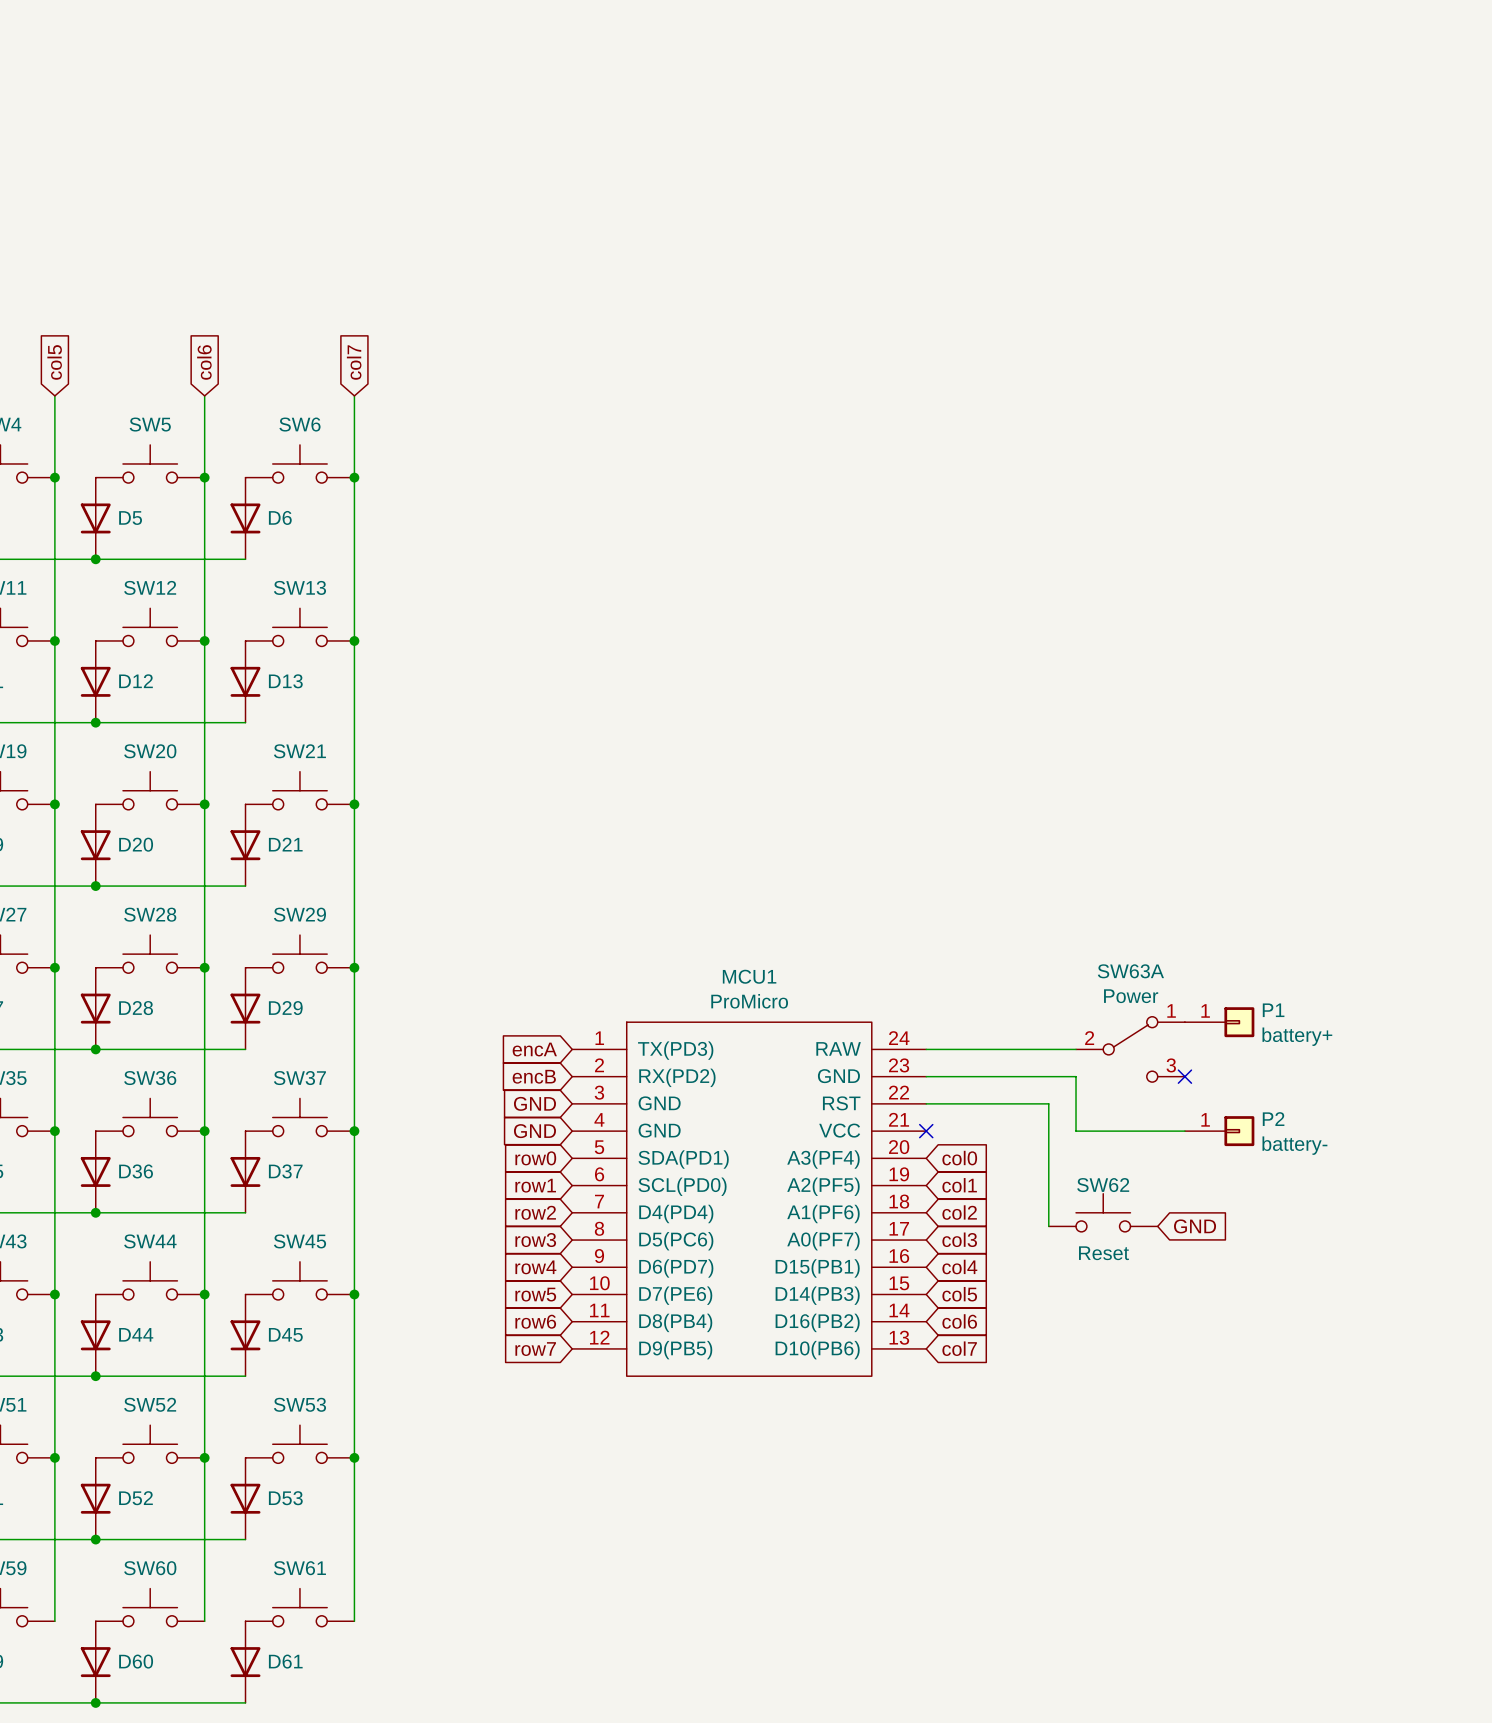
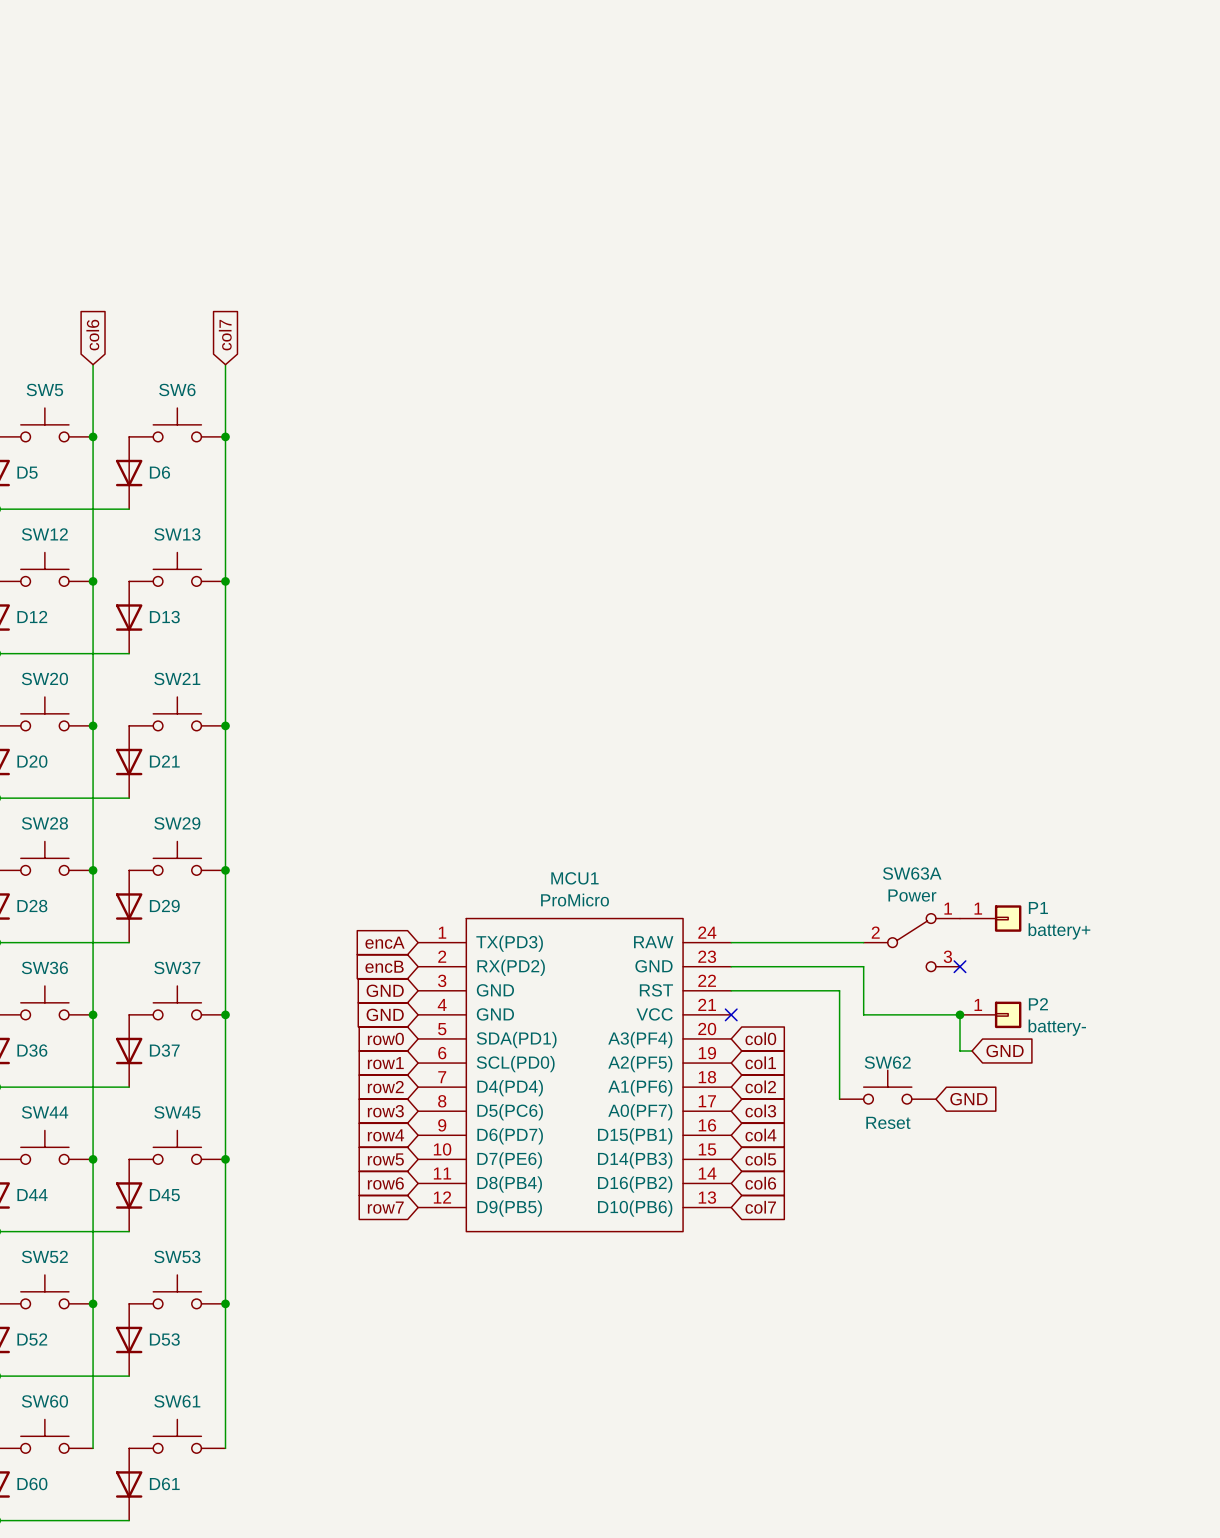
wire: none -> (959, 1014) (959, 1051) (972, 1051)
junction: none -> (959, 1014)
global label: none -> GND (1005, 1051)

